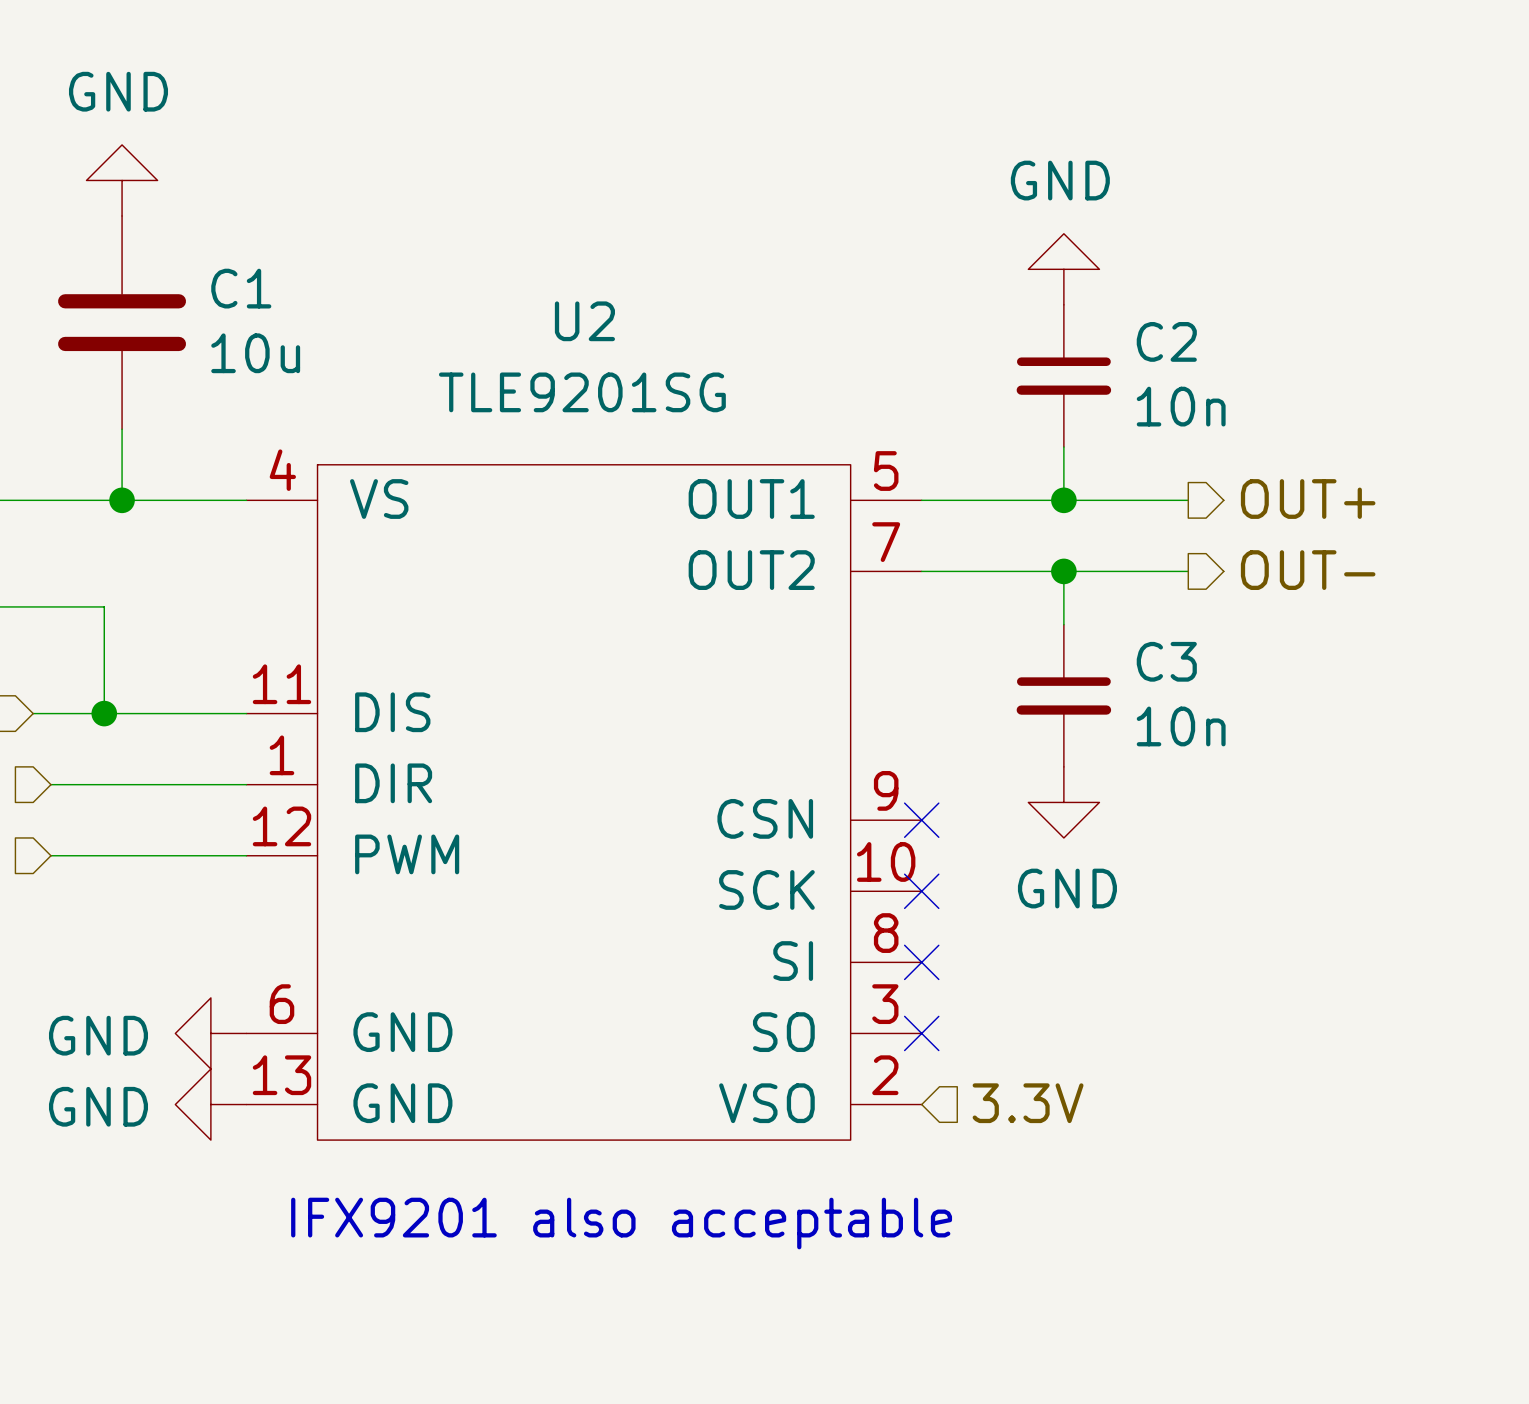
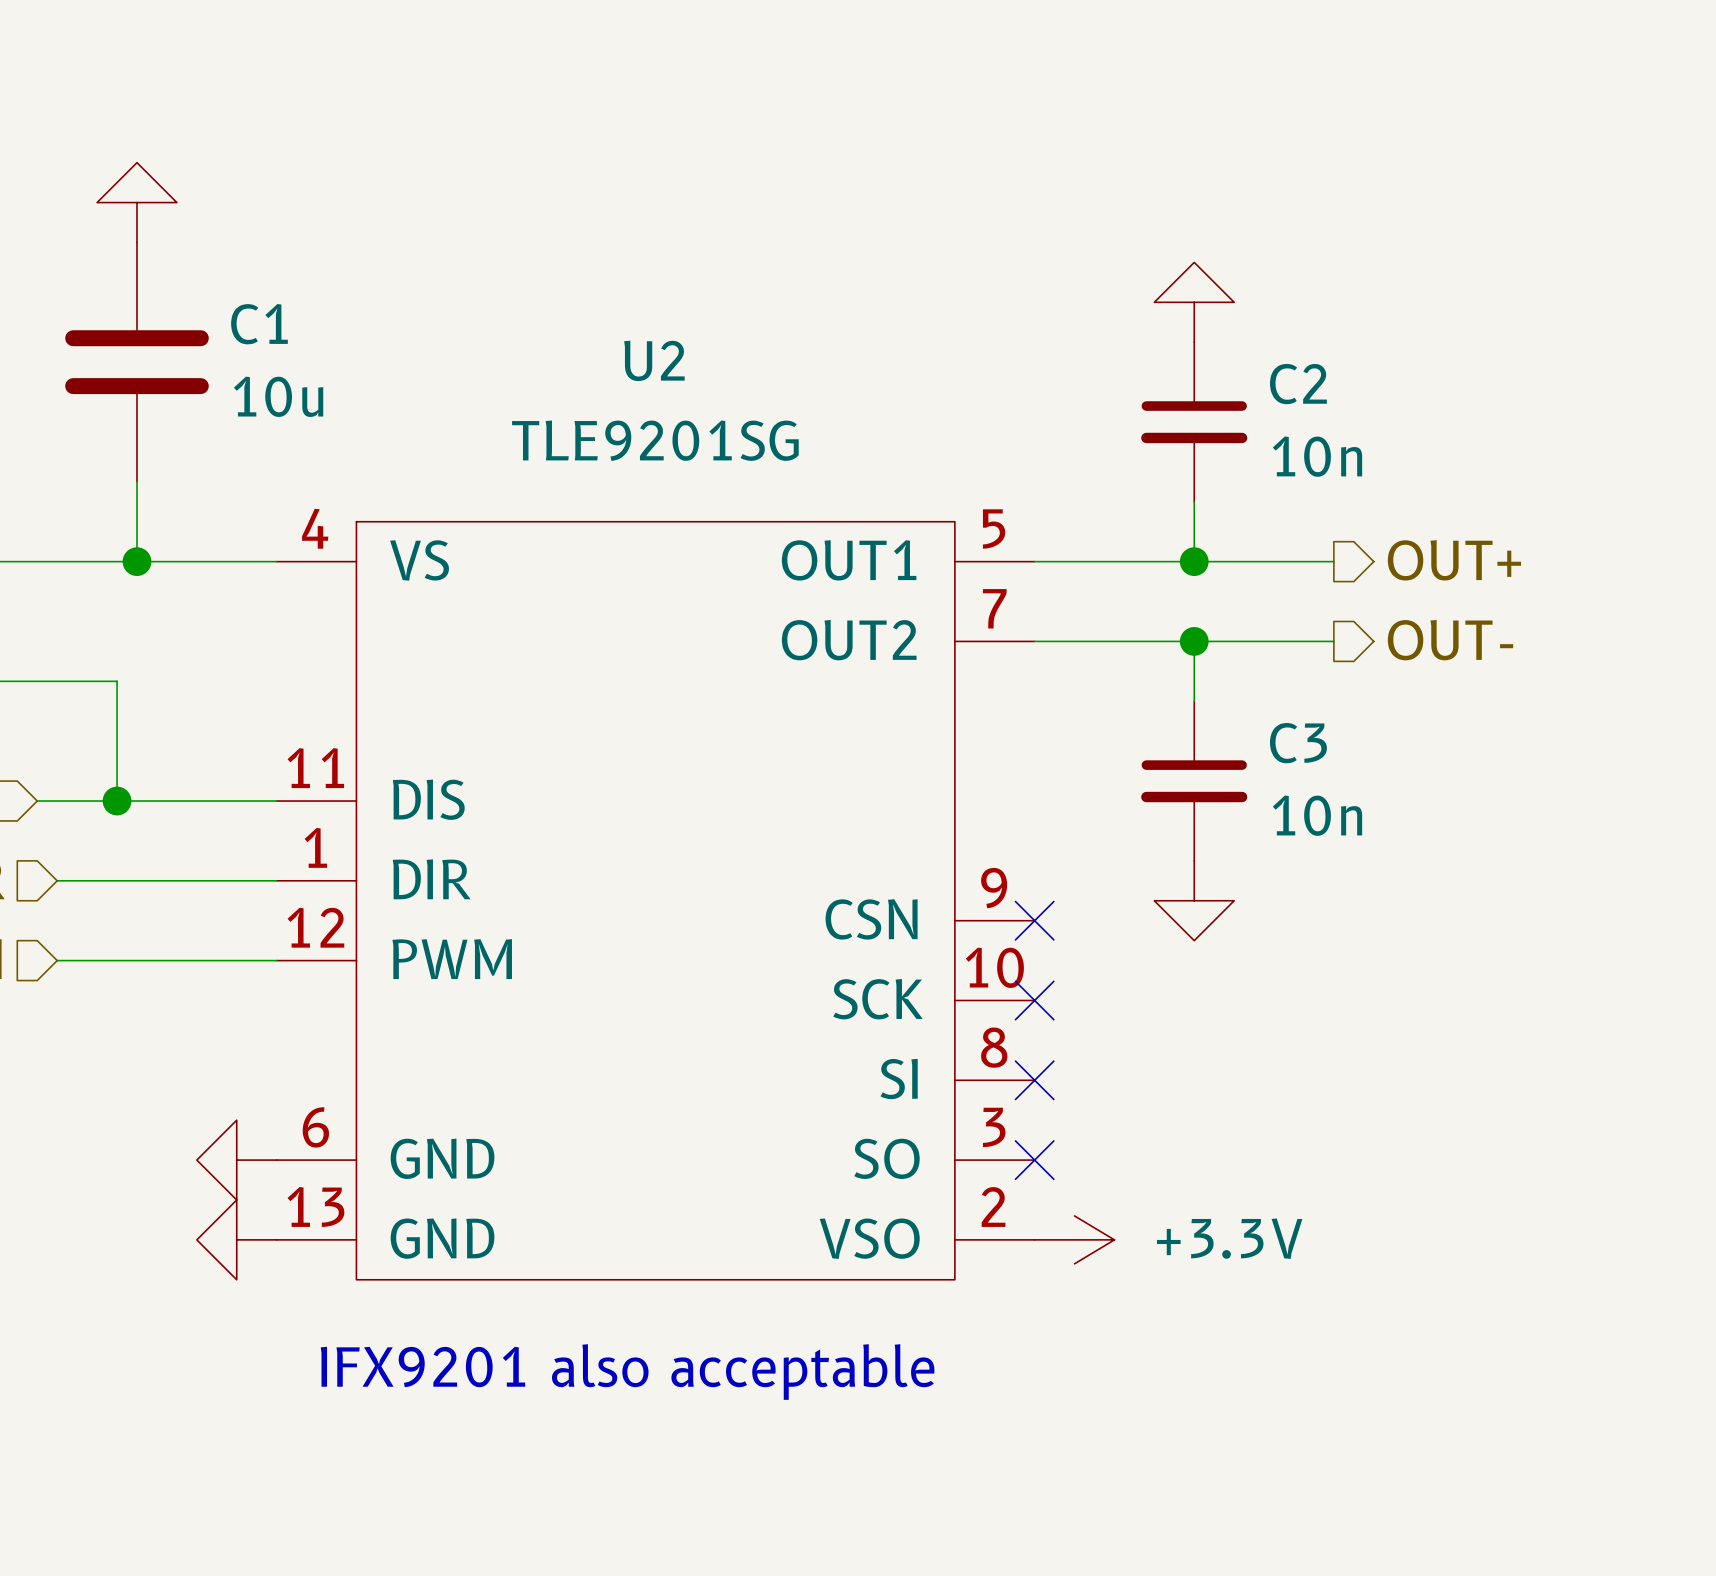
power symbol text: GND (118, 91) -> none
power symbol text: GND (1060, 180) -> none
power symbol text: GND (1067, 888) -> none
power symbol text: GND (98, 1035) -> none
hierarchical label: 3.3V (1028, 1103) -> none
power symbol: none -> +3.3V (1074, 1239)
power symbol text: GND (98, 1106) -> none

